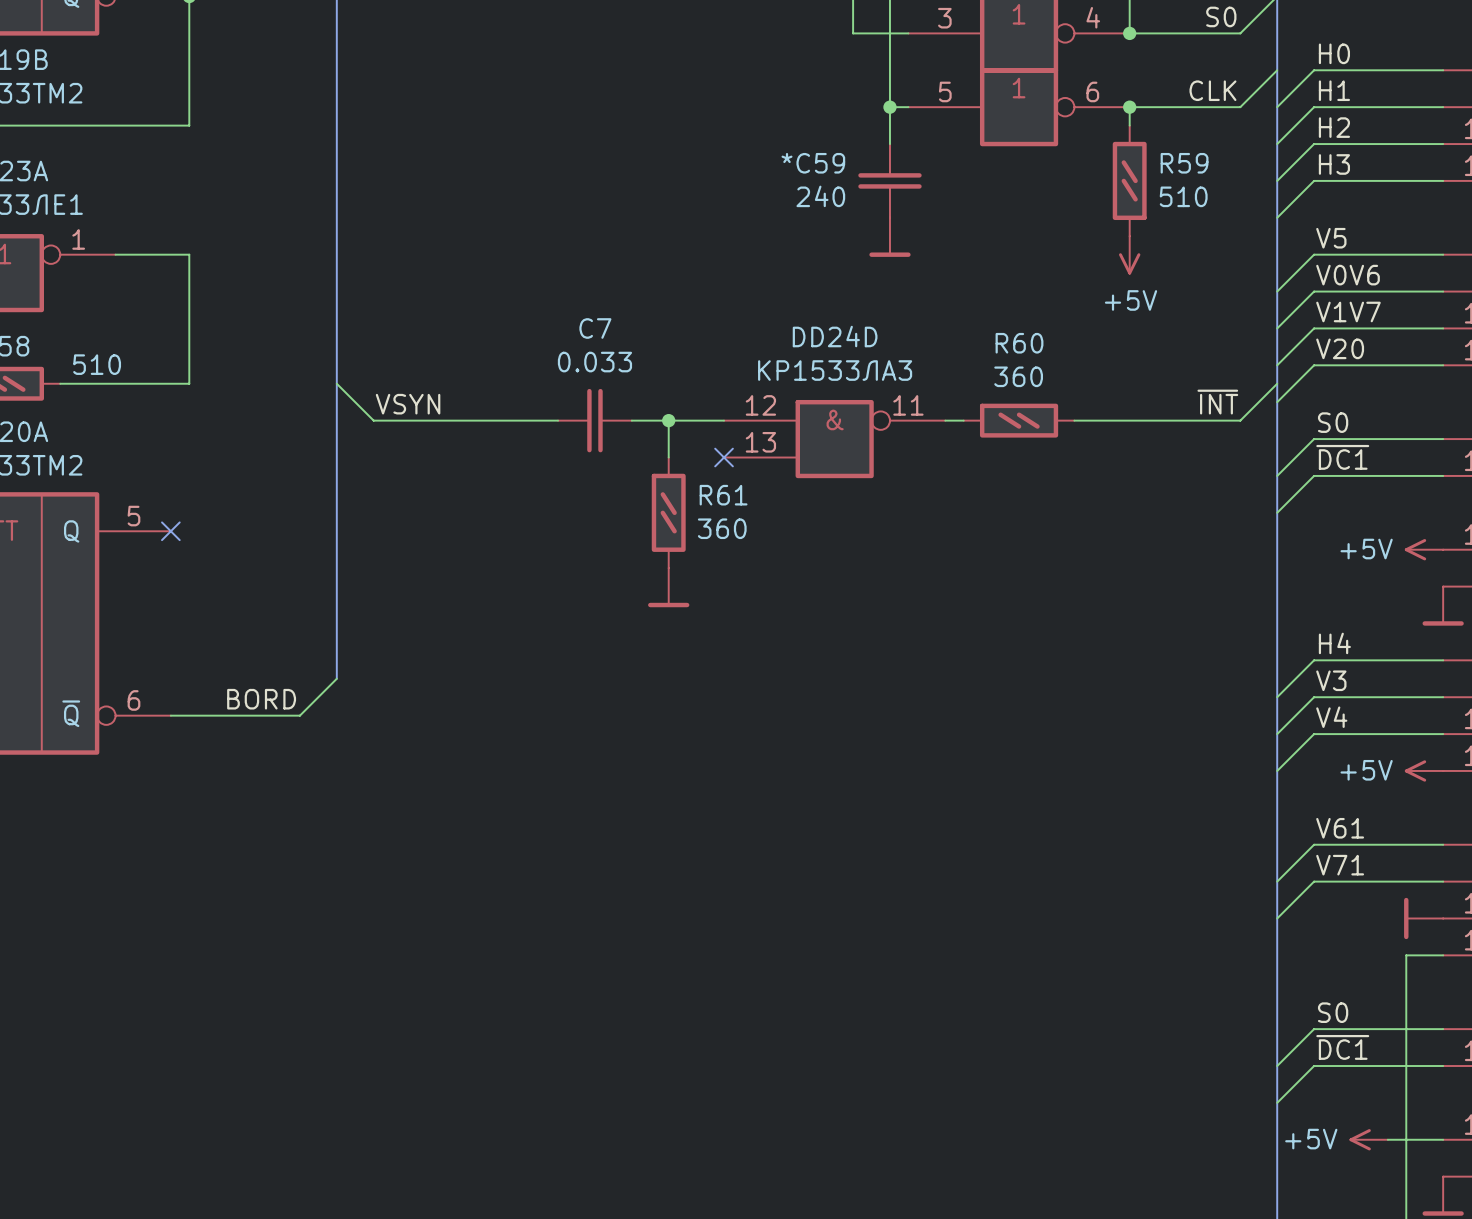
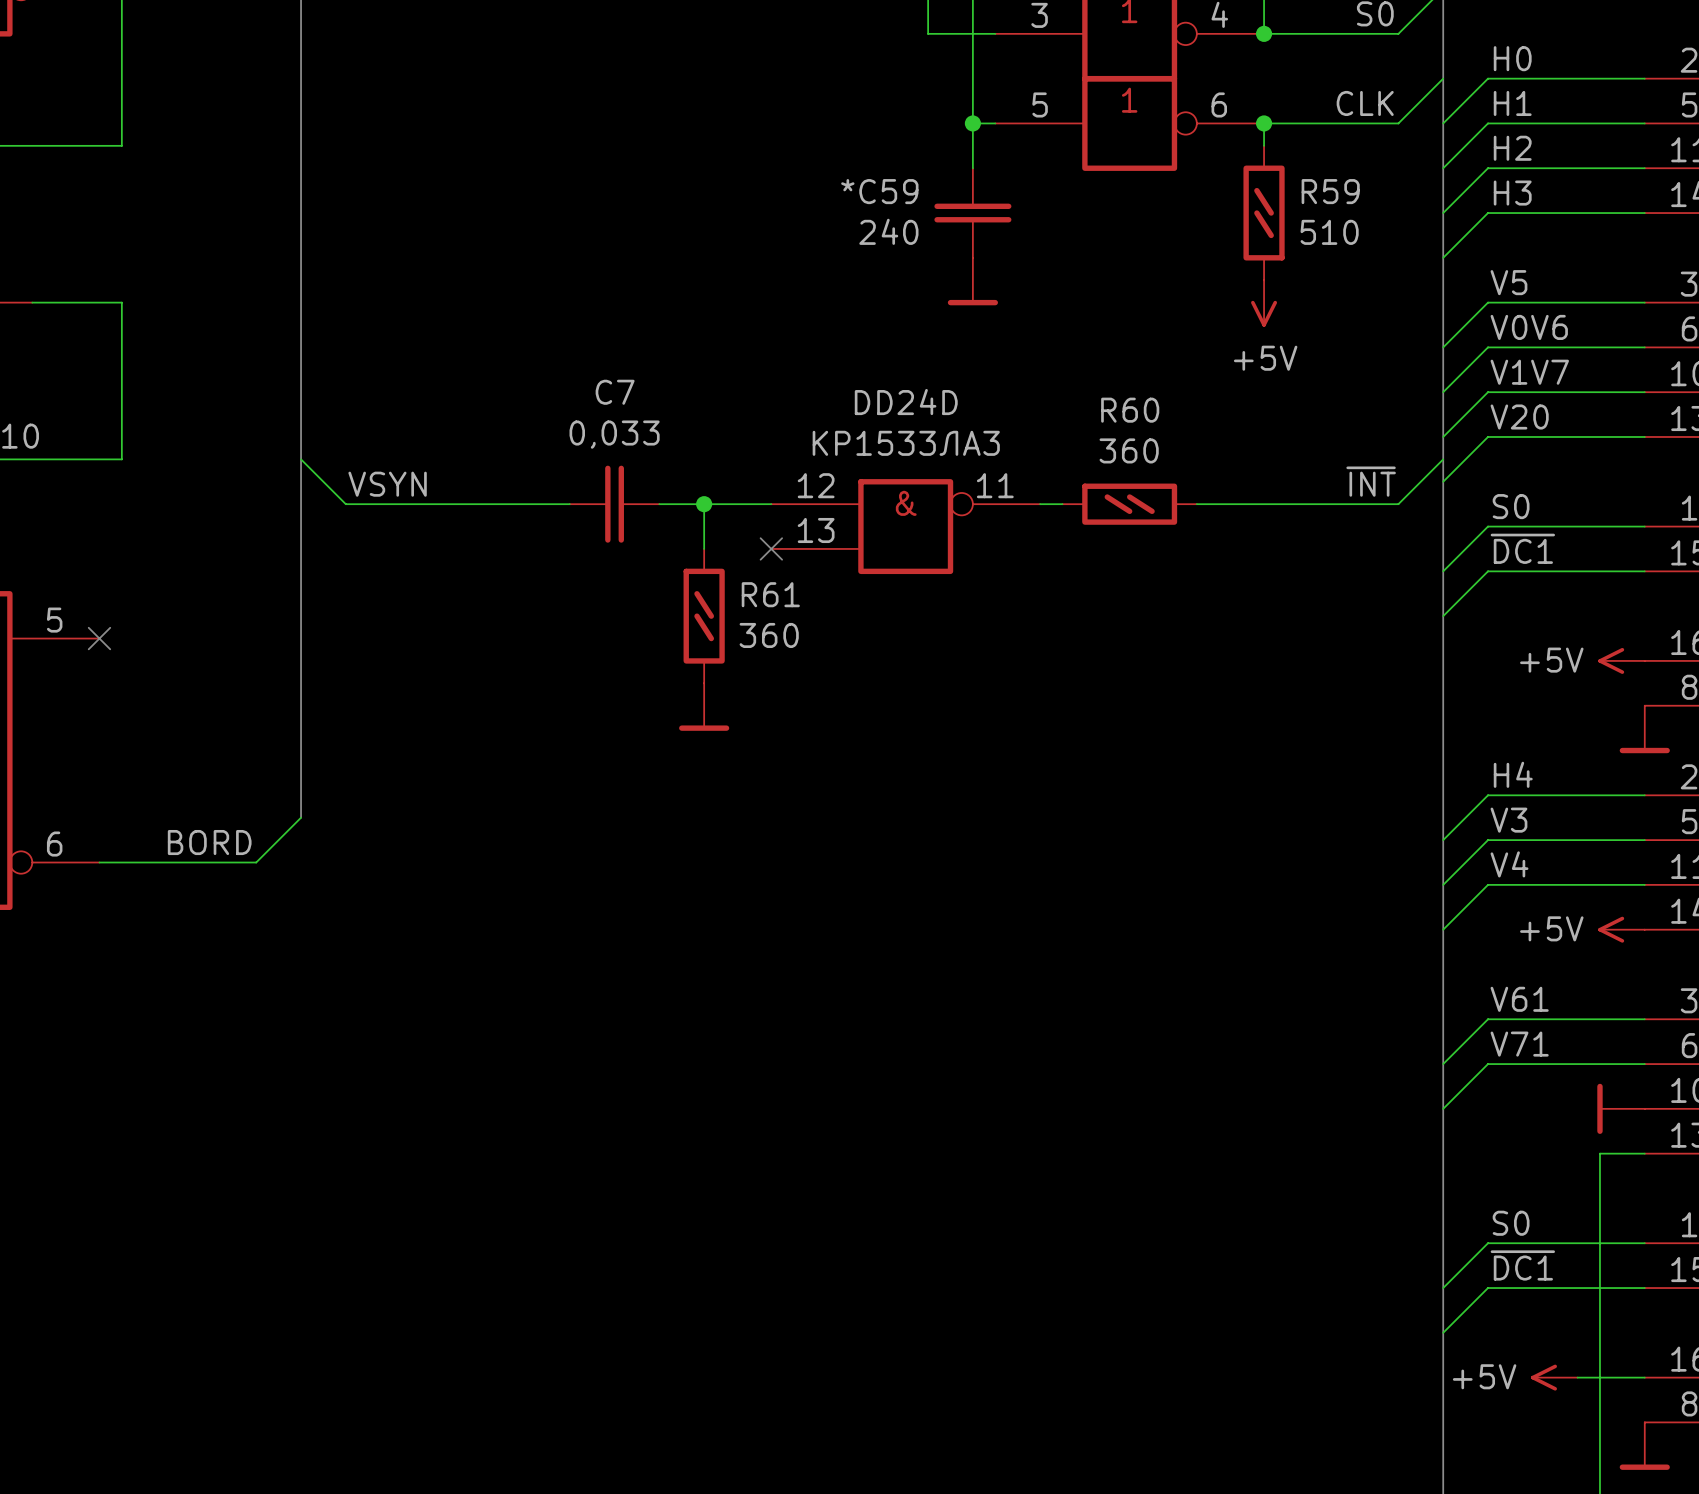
C7 value: 0.033 (594, 362) -> 0,033 (614, 434)

